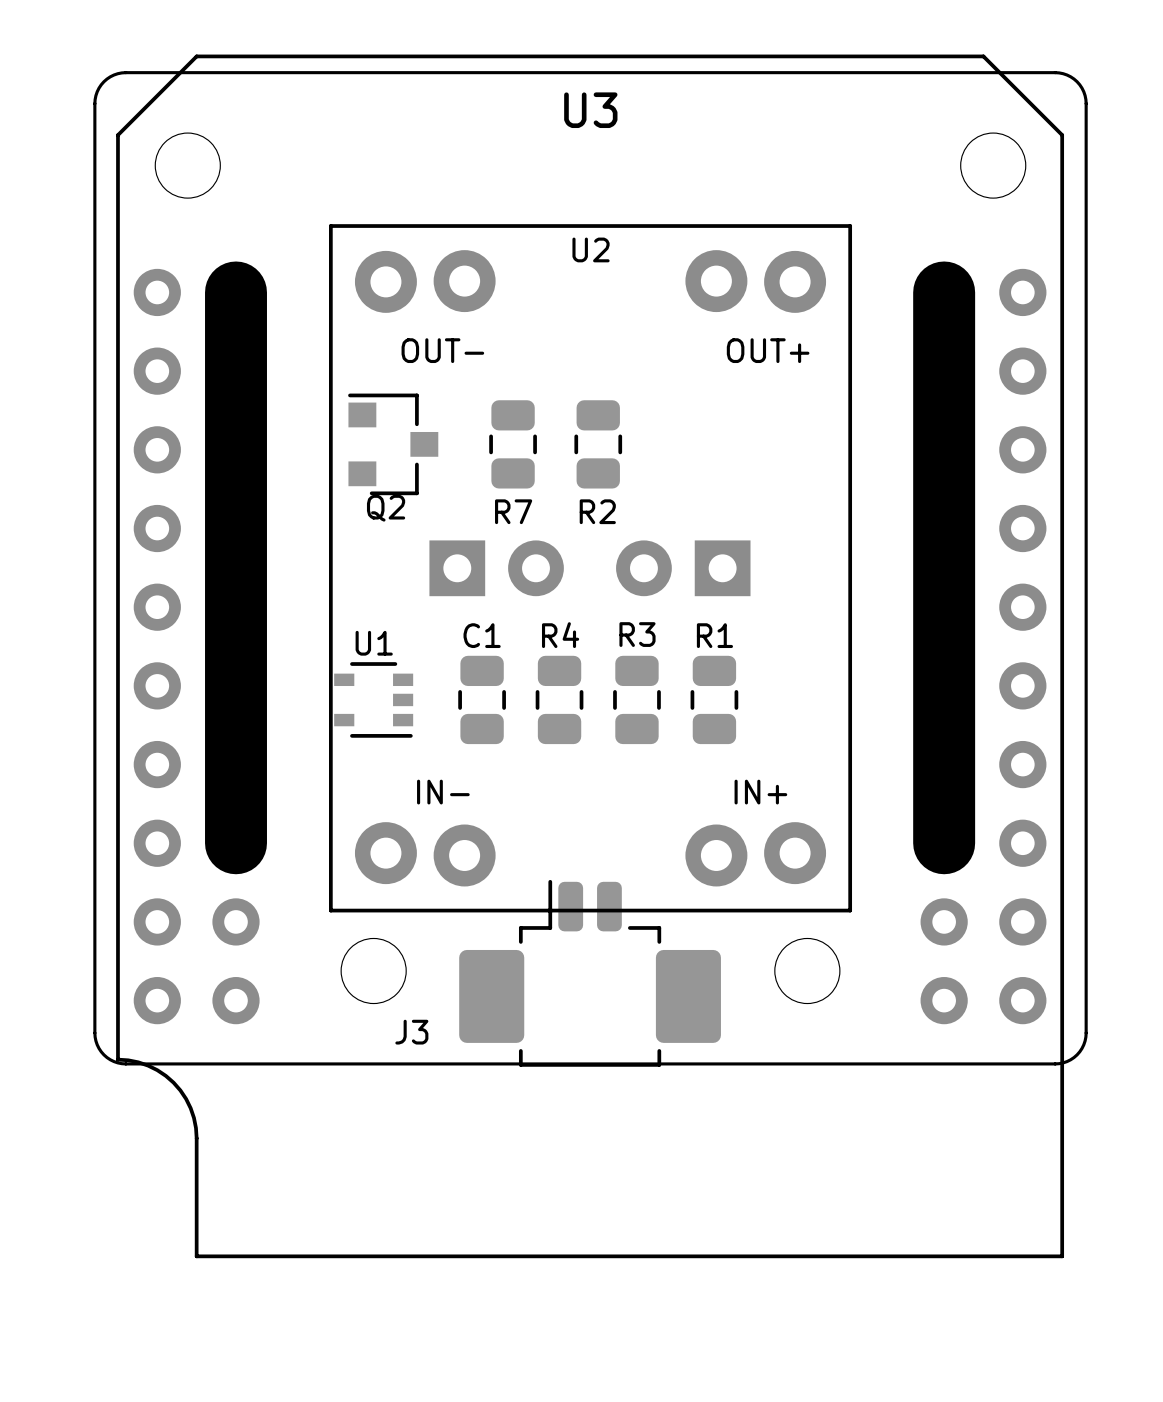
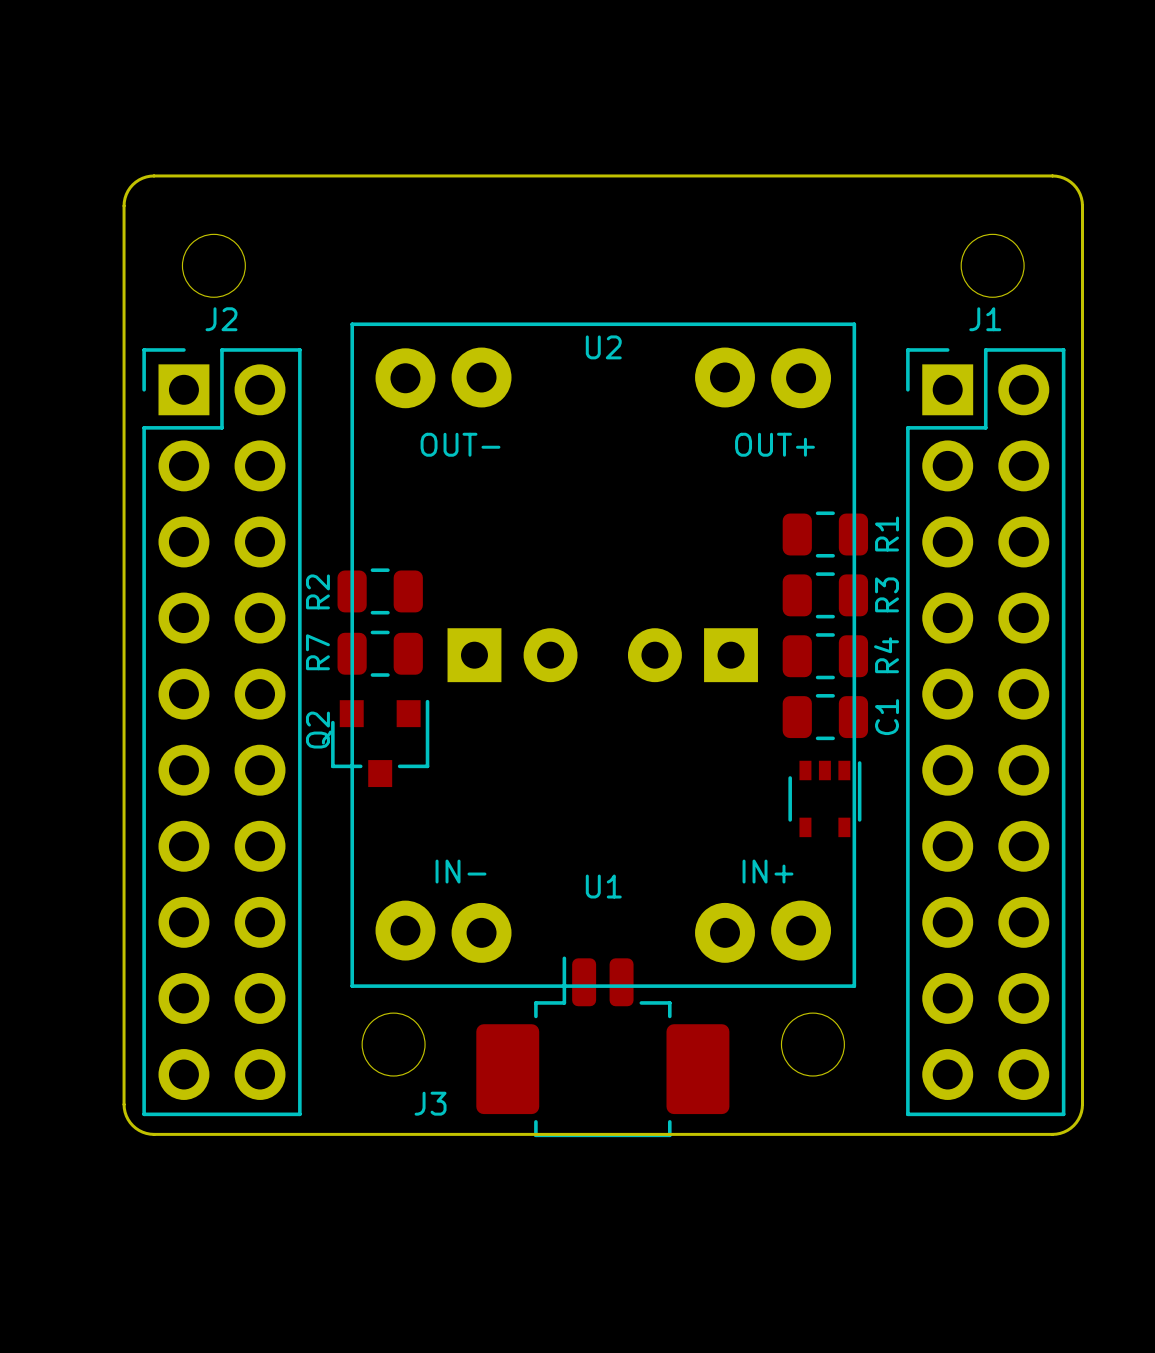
Q2 rotation: 0° (393, 444) -> 90° clockwise (380, 743)
Q2 position: (393, 444) -> (380, 743)
R7 rotation: 0° (513, 444) -> 90° clockwise (380, 653)
R7 position: (513, 444) -> (380, 653)
R2 rotation: 0° (598, 444) -> 90° clockwise (380, 591)
R2 position: (598, 444) -> (380, 591)
U1 name position: U1 (374, 643) -> U1 (603, 886)
J2: none -> (221, 732)
J1: none -> (985, 732)
U3: (590, 656) -> none
U1 rotation: 0° (373, 699) -> 90° counterclockwise (824, 798)
U1 position: (373, 699) -> (824, 798)
C1 rotation: 0° (482, 699) -> 90° clockwise (825, 717)
C1 position: (482, 699) -> (825, 717)
R4 rotation: 0° (559, 699) -> 90° clockwise (825, 656)
R4 position: (559, 699) -> (825, 656)
R3 rotation: 0° (636, 699) -> 90° clockwise (825, 595)
R3 position: (636, 699) -> (825, 595)
R1 rotation: 0° (714, 699) -> 90° clockwise (825, 534)
R1 position: (714, 699) -> (825, 534)

